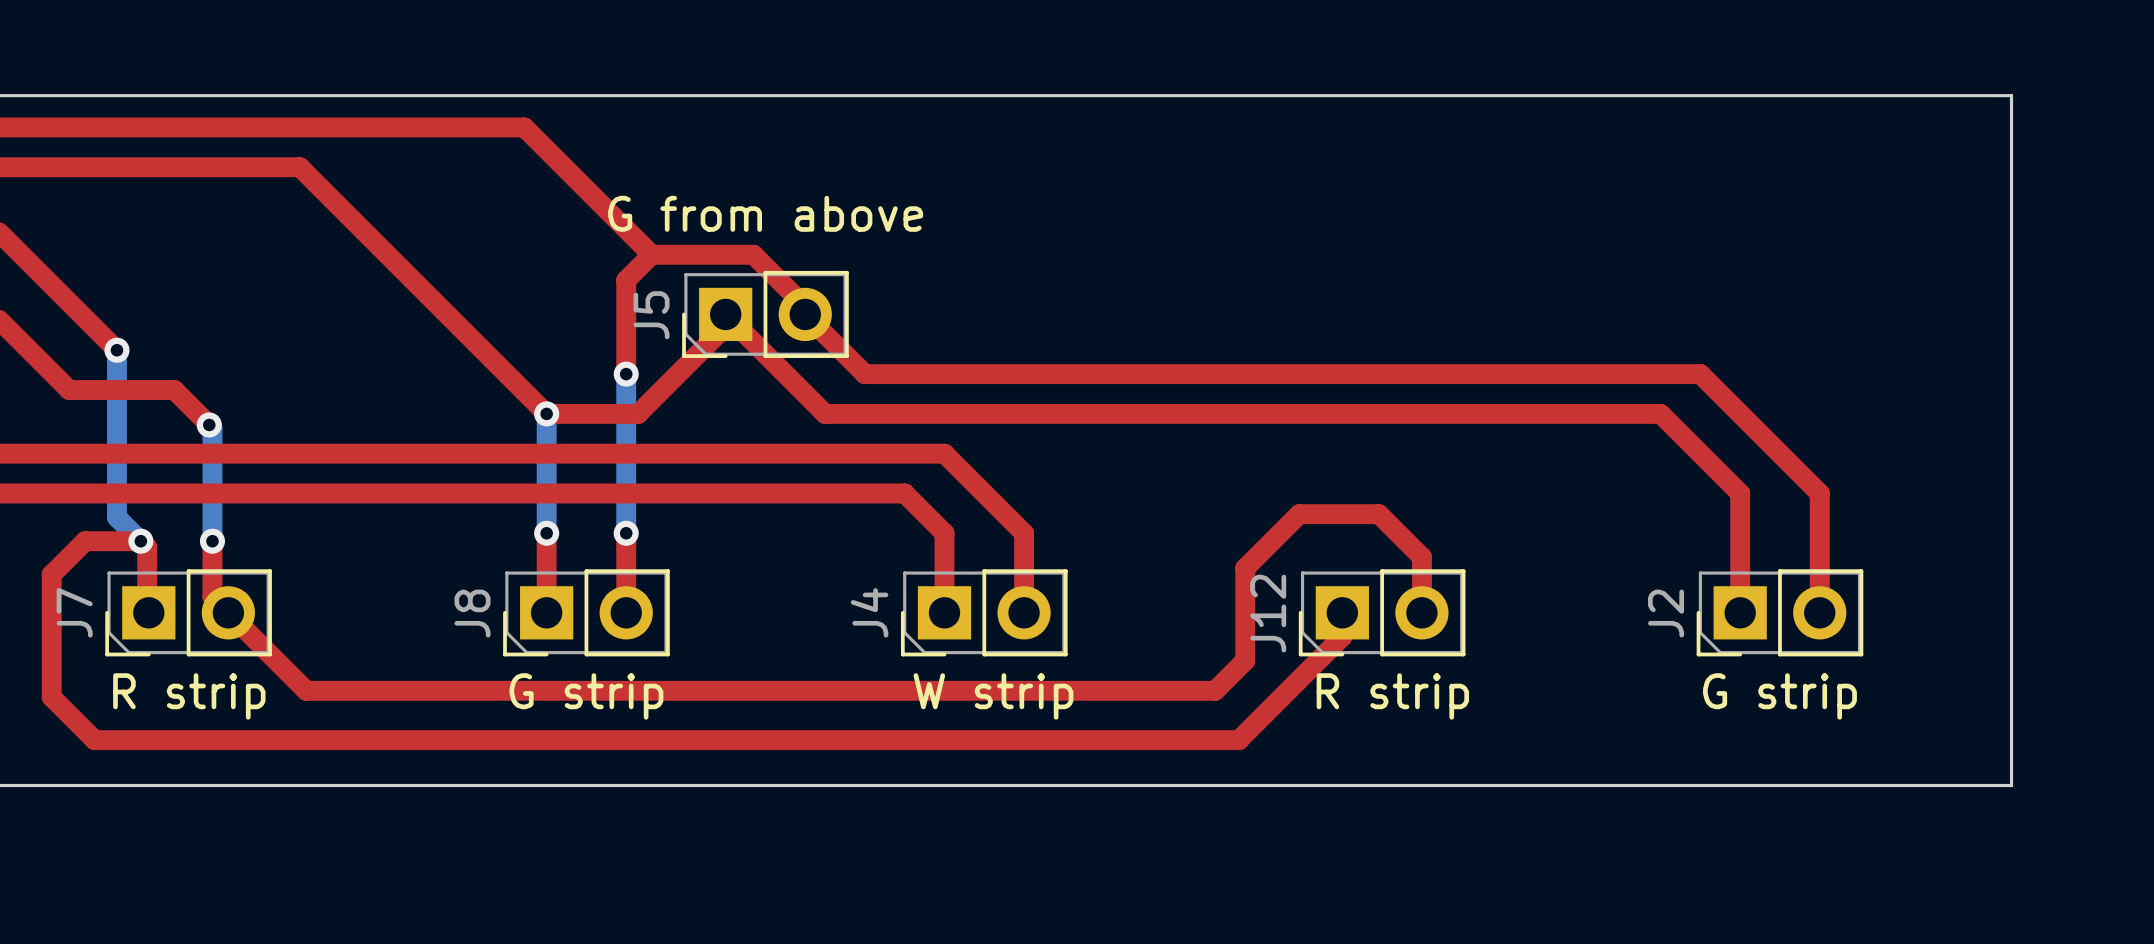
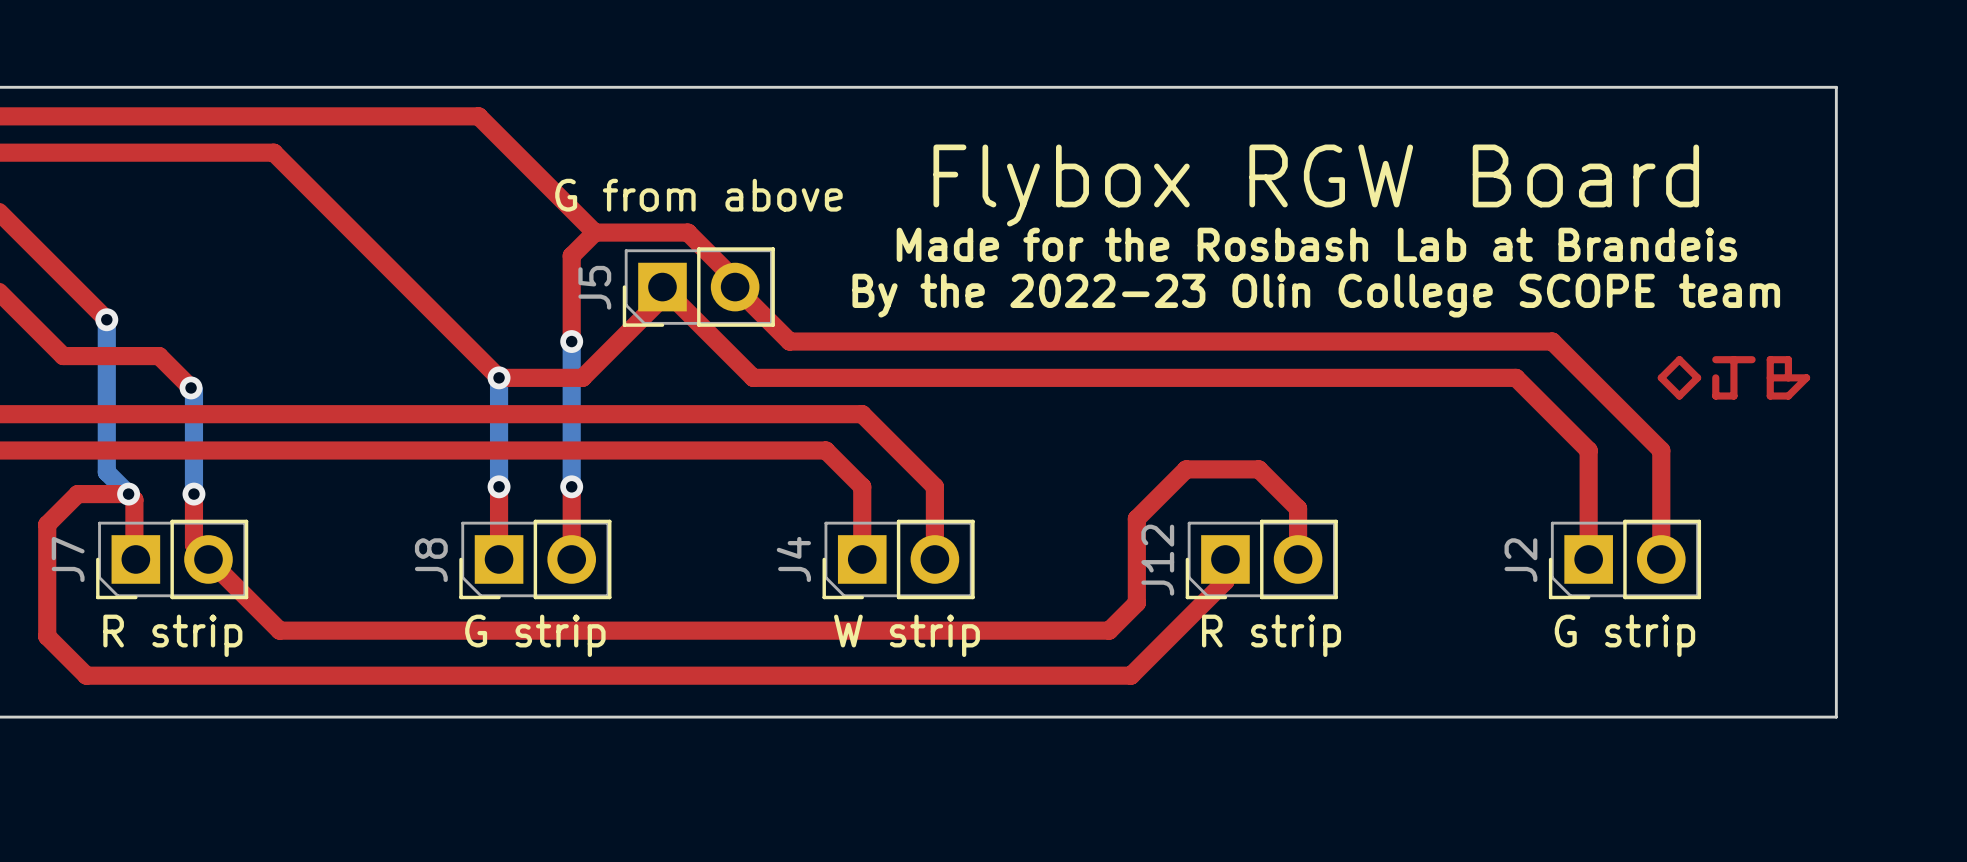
text: none -> Flybox RGW Board (1316, 185)
text: none -> Made for the Rosbash Lab at Brandeis (1316, 244)
text: none -> By the 2022-23 Olin College SCOPE team (1316, 295)
top track: none -> (1679, 359) (1661, 377) (1679, 396) (1697, 377) (1679, 359)
top track: none -> (1715, 359) (1752, 359)
top track: none -> (1733, 359) (1733, 396) (1715, 396) (1715, 377)
top track: none -> (1770, 377) (1806, 377) (1788, 396) (1770, 396) (1770, 359) (1788, 359) (1788, 377)

